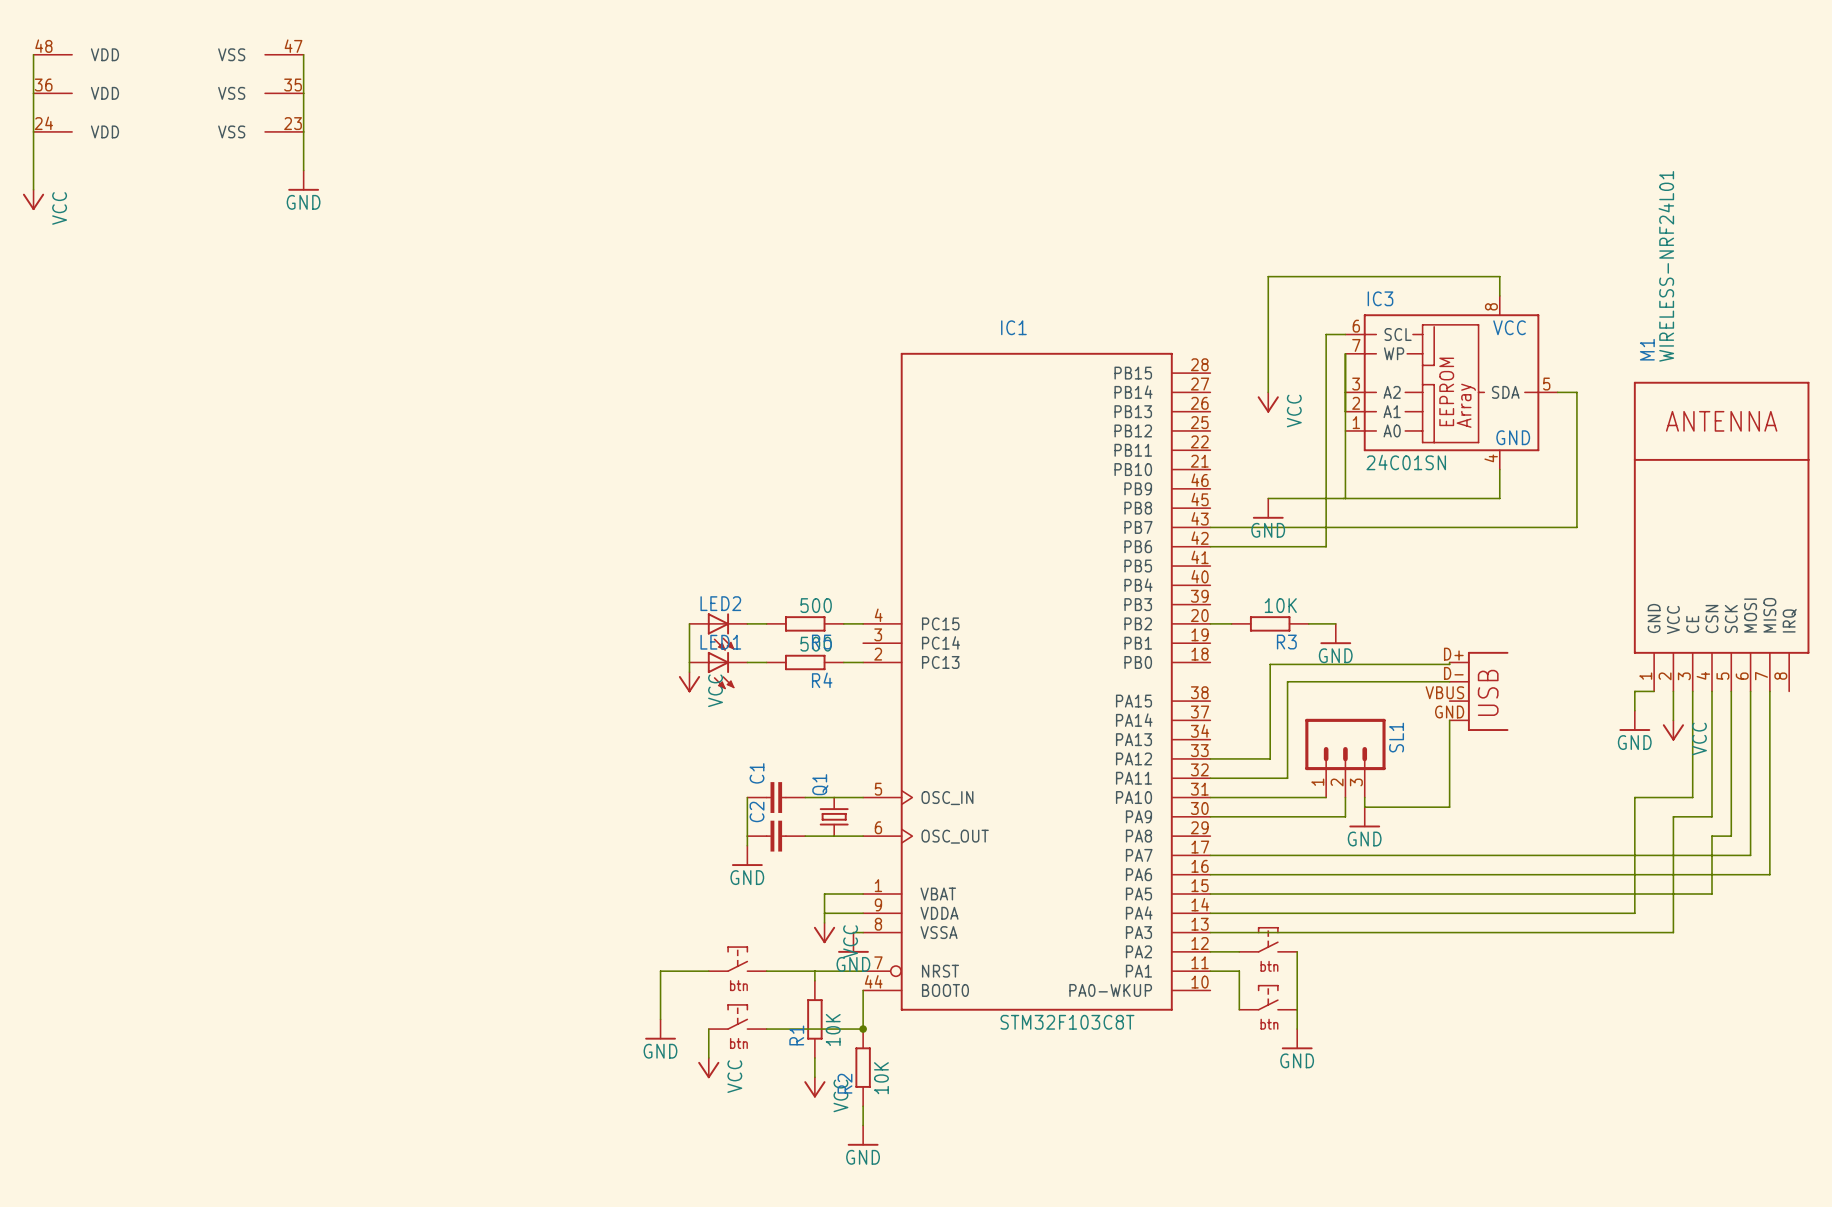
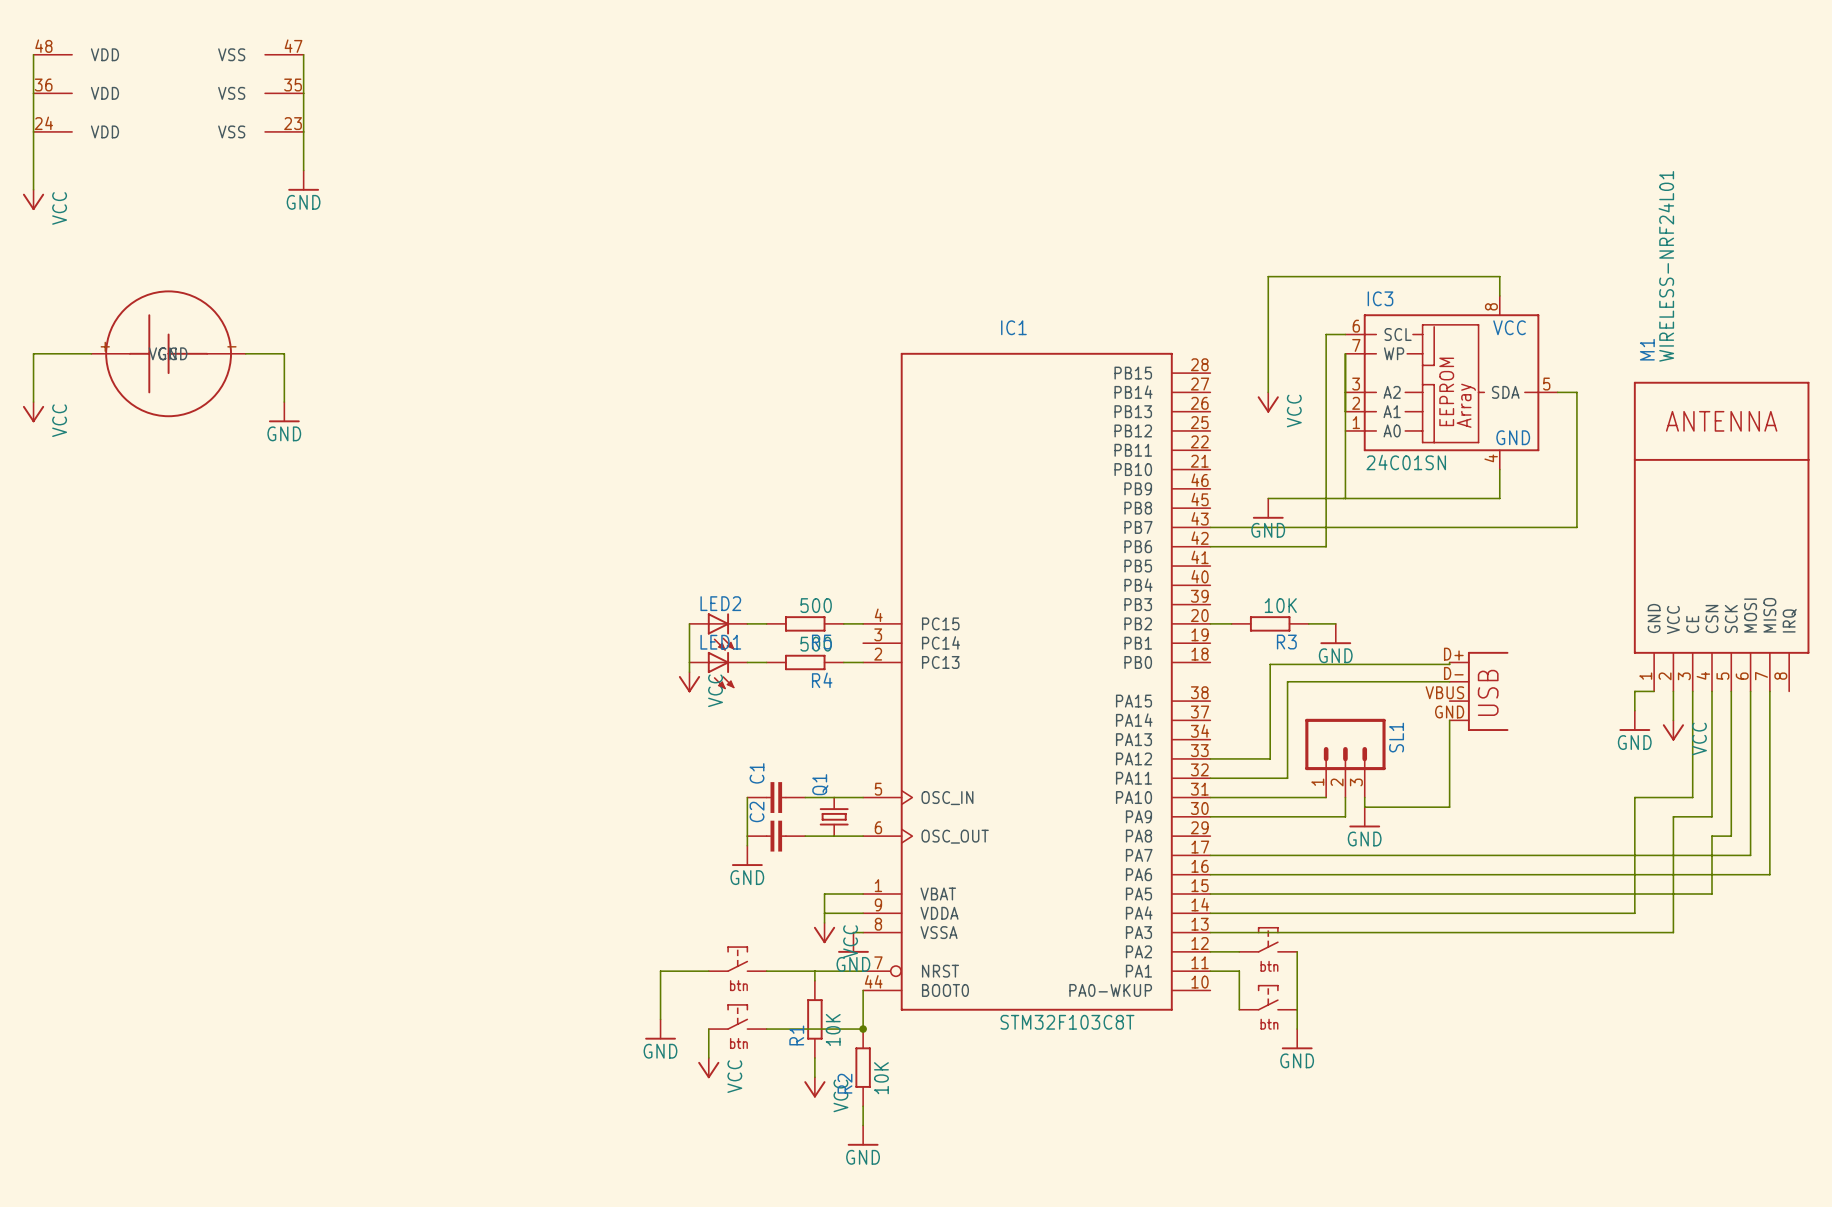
wire: none -> (91, 353) (33, 353) (33, 402)
part: none -> (168, 353)
wire: none -> (245, 353) (284, 353) (284, 402)
power symbol: none -> VCC (33, 412)
power symbol: none -> GND (284, 412)

